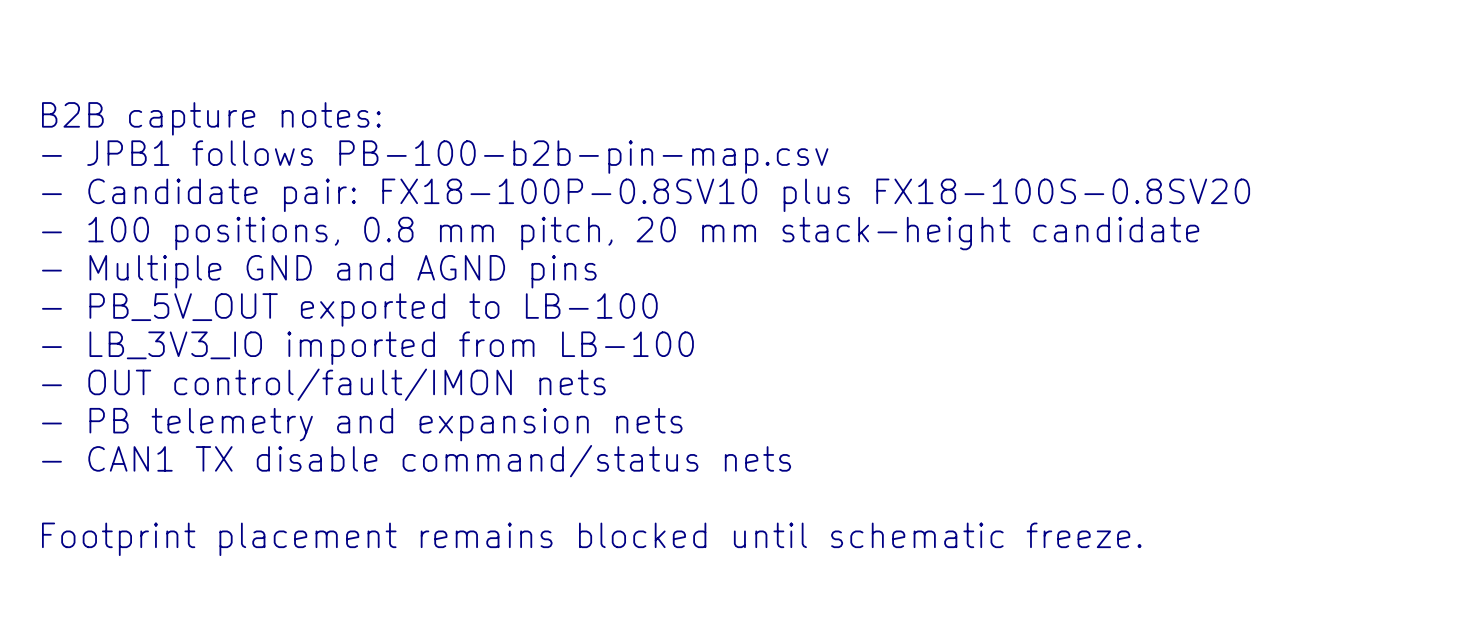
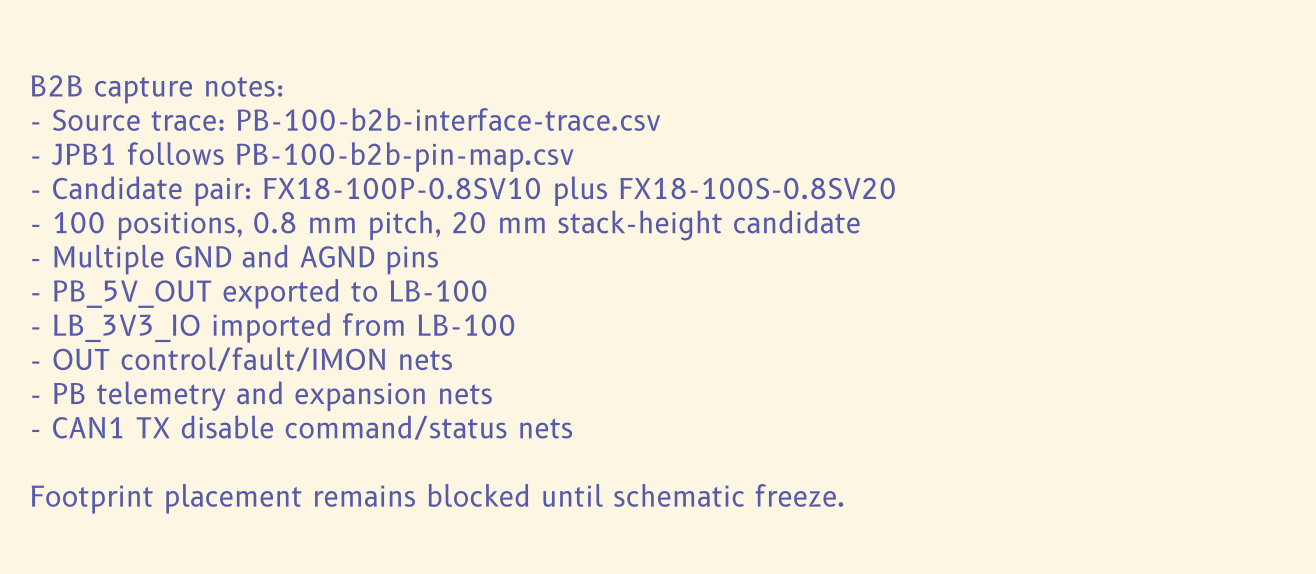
text: none -> B2B capture notes: (156, 89)
text: B2B capture notes: (211, 118) -> - Source trace: PB-100-b2b-interface-trace.csv (346, 119)

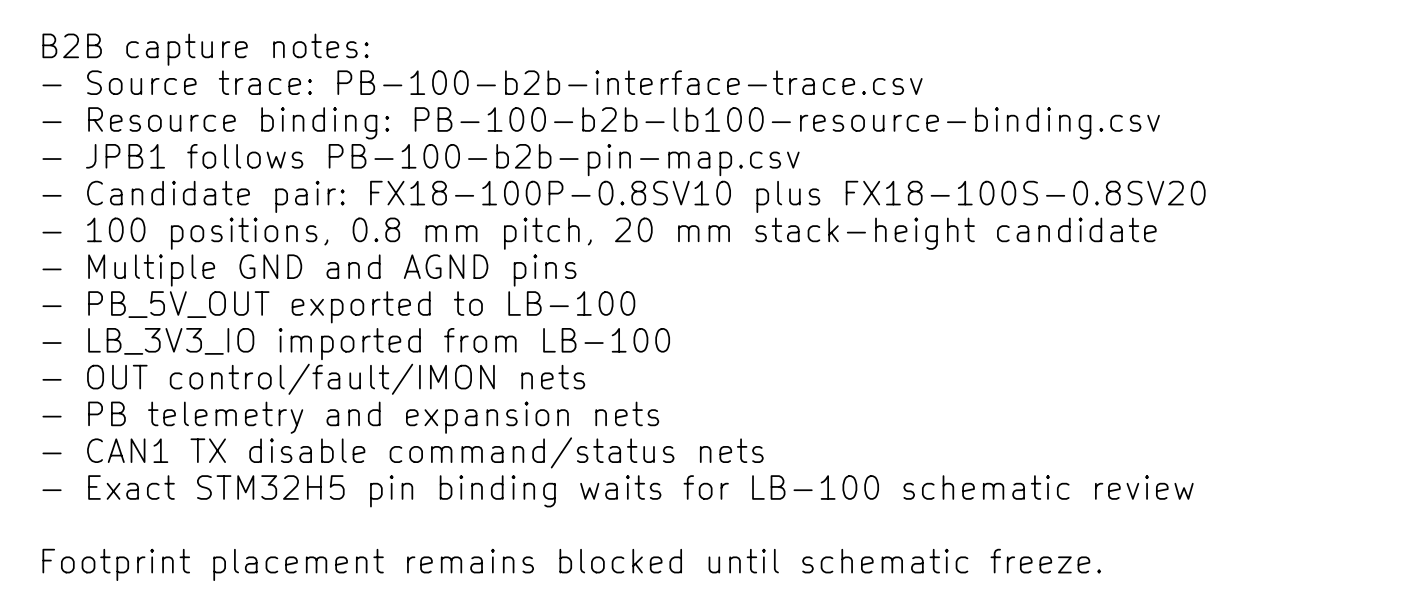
text: none -> B2B capture notes: (205, 49)
text: B2B capture notes: (156, 89) -> - Source trace: PB-100-b2b-interface-trace.csv (482, 82)
text: - Source trace: PB-100-b2b-interface-trace.csv (346, 119) -> - Resource binding: PB-100-b2b-lb100-resource-binding.csv (601, 123)
text: none -> - Exact STM32H5 pin binding waits for LB-100 schematic review (618, 491)
text position: Footprint placement remains blocked until schematic freeze. (437, 498) -> Footprint placement remains blocked until schematic freeze. (571, 564)

